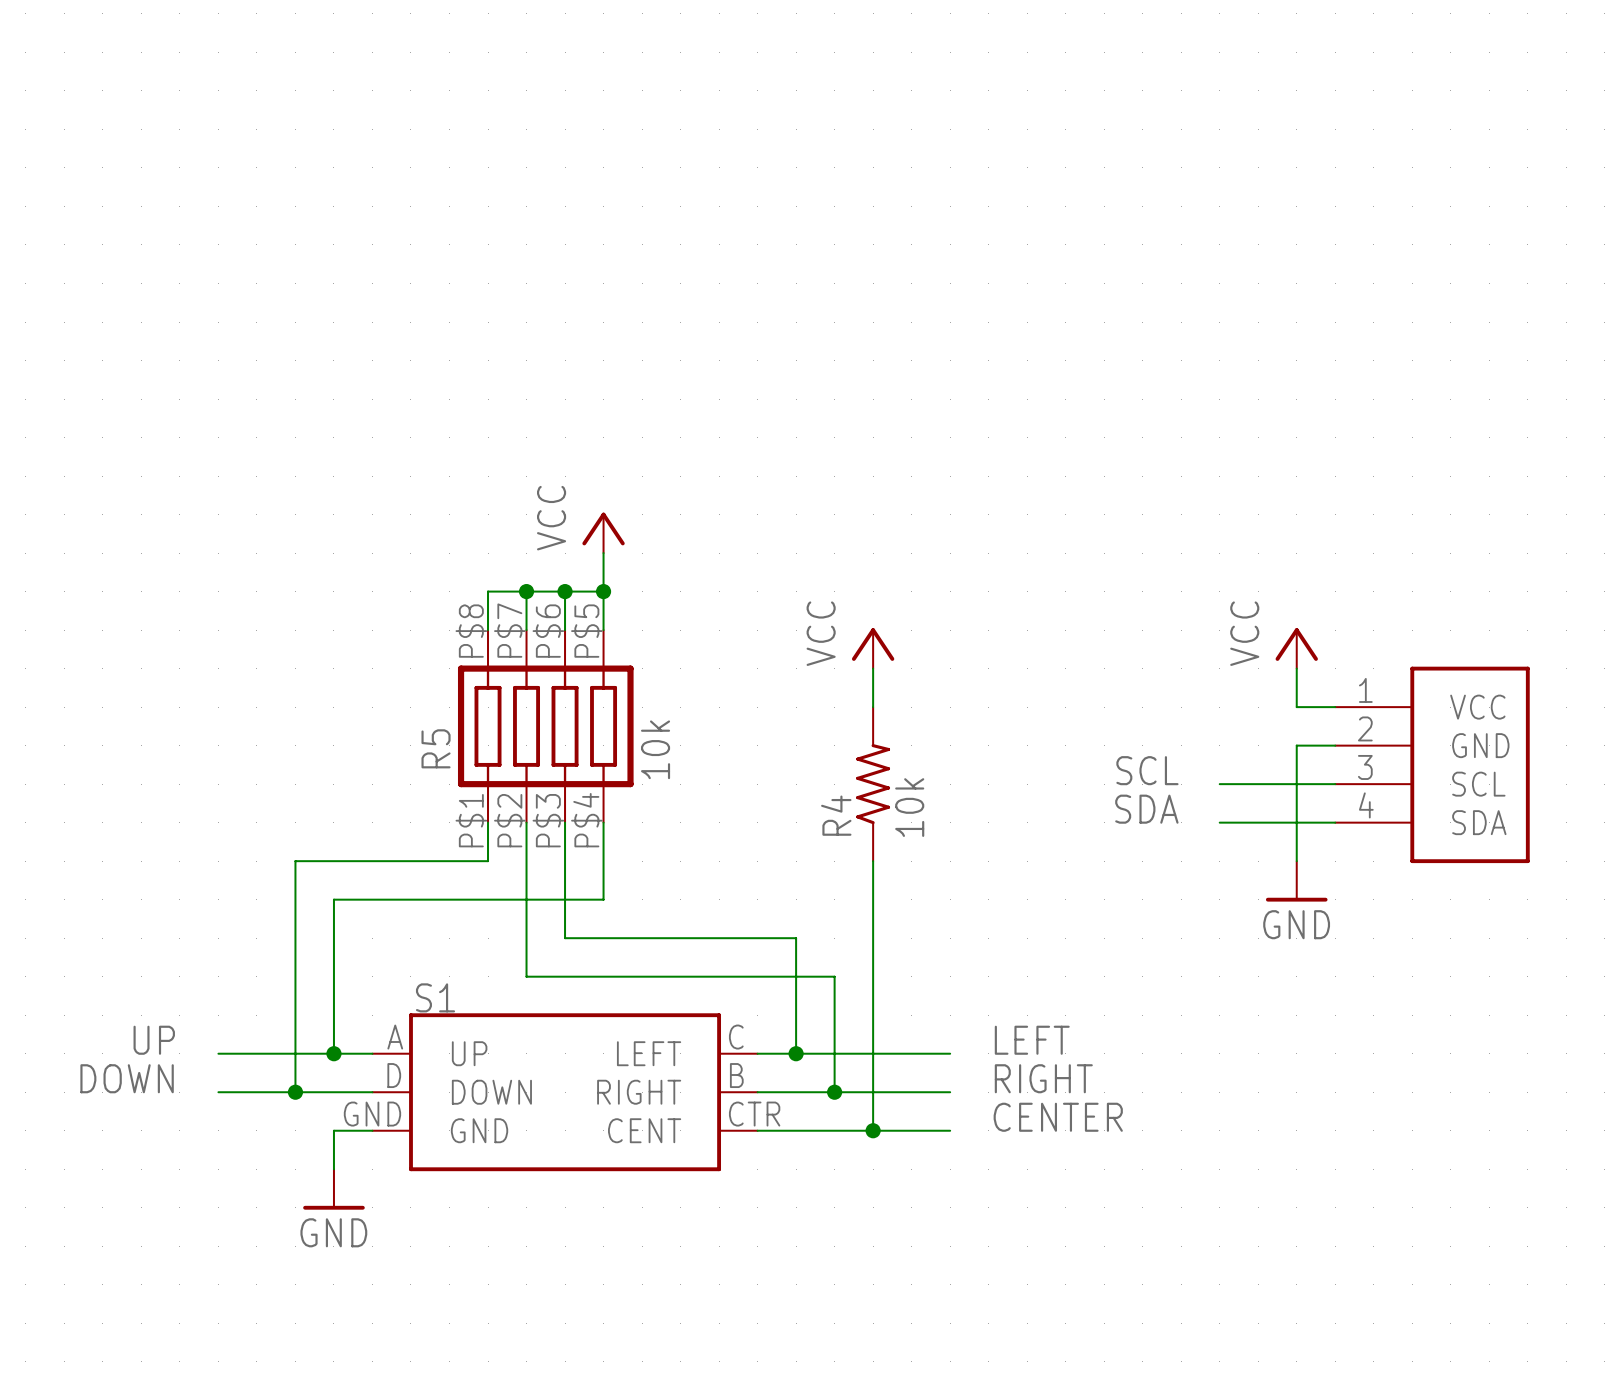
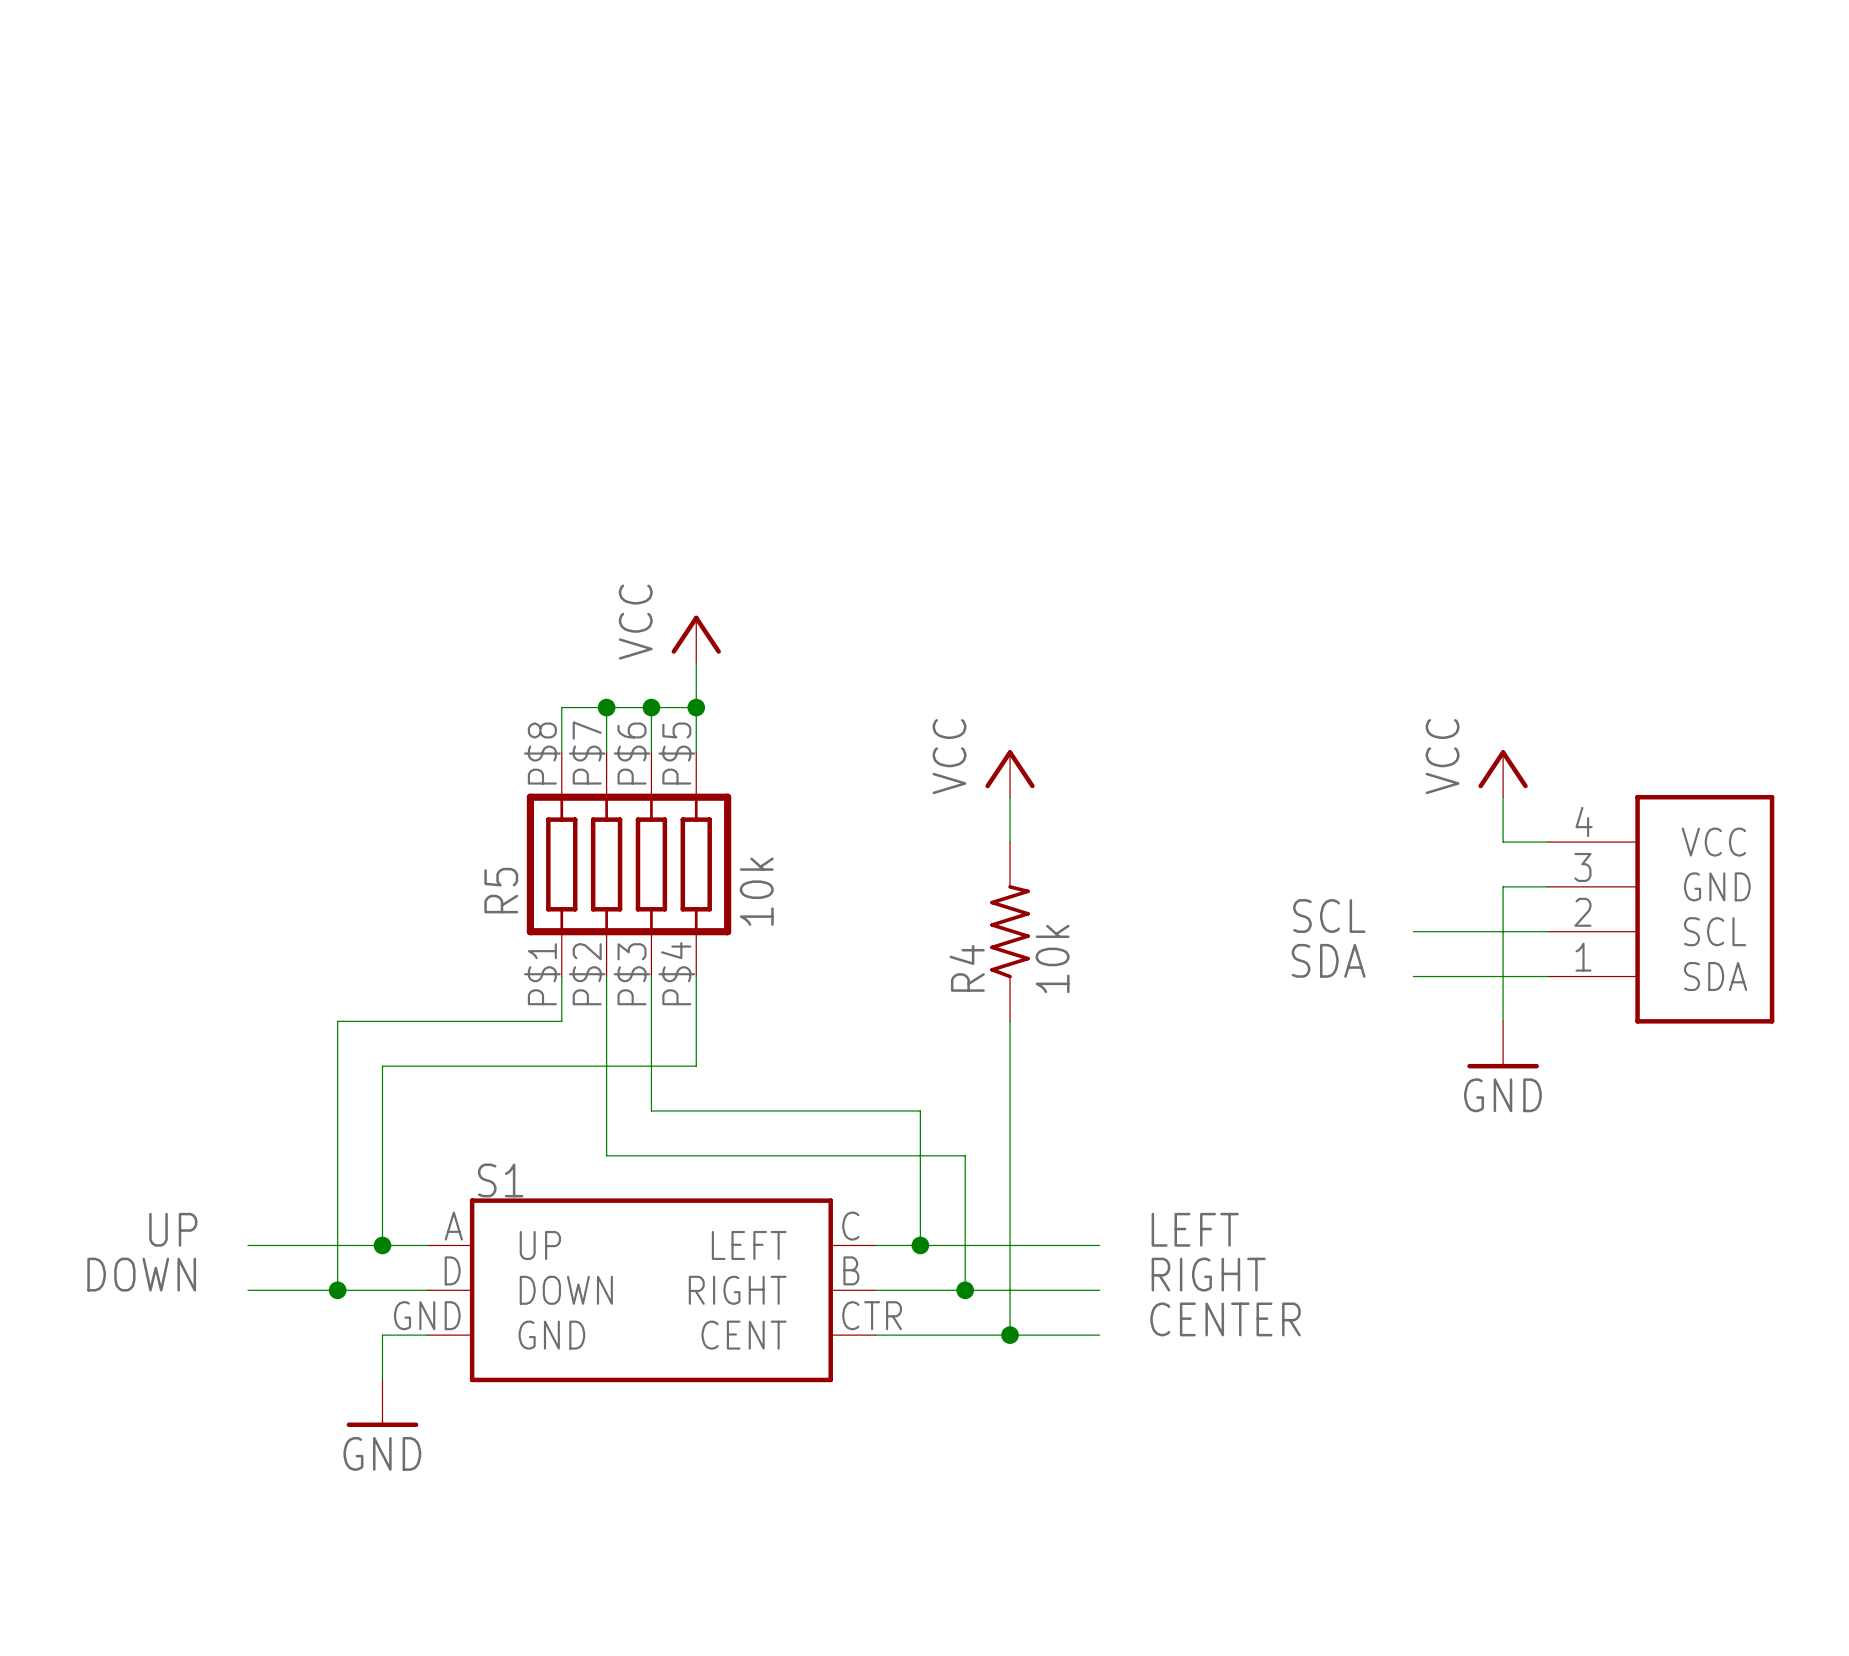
part pin number: 1 (1365, 690) -> 4 (1584, 821)
part pin number: 2 (1365, 728) -> 3 (1582, 867)
part pin number: 3 (1365, 767) -> 2 (1582, 912)
part pin number: 4 (1366, 805) -> 1 (1583, 957)

